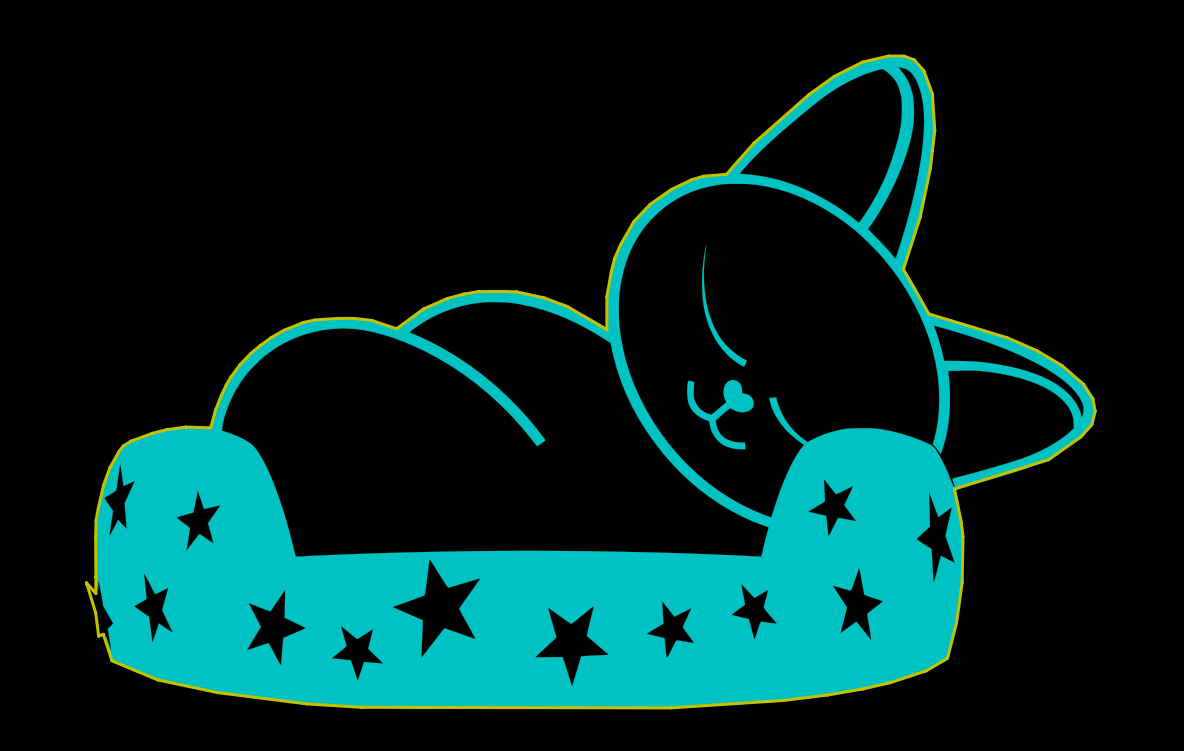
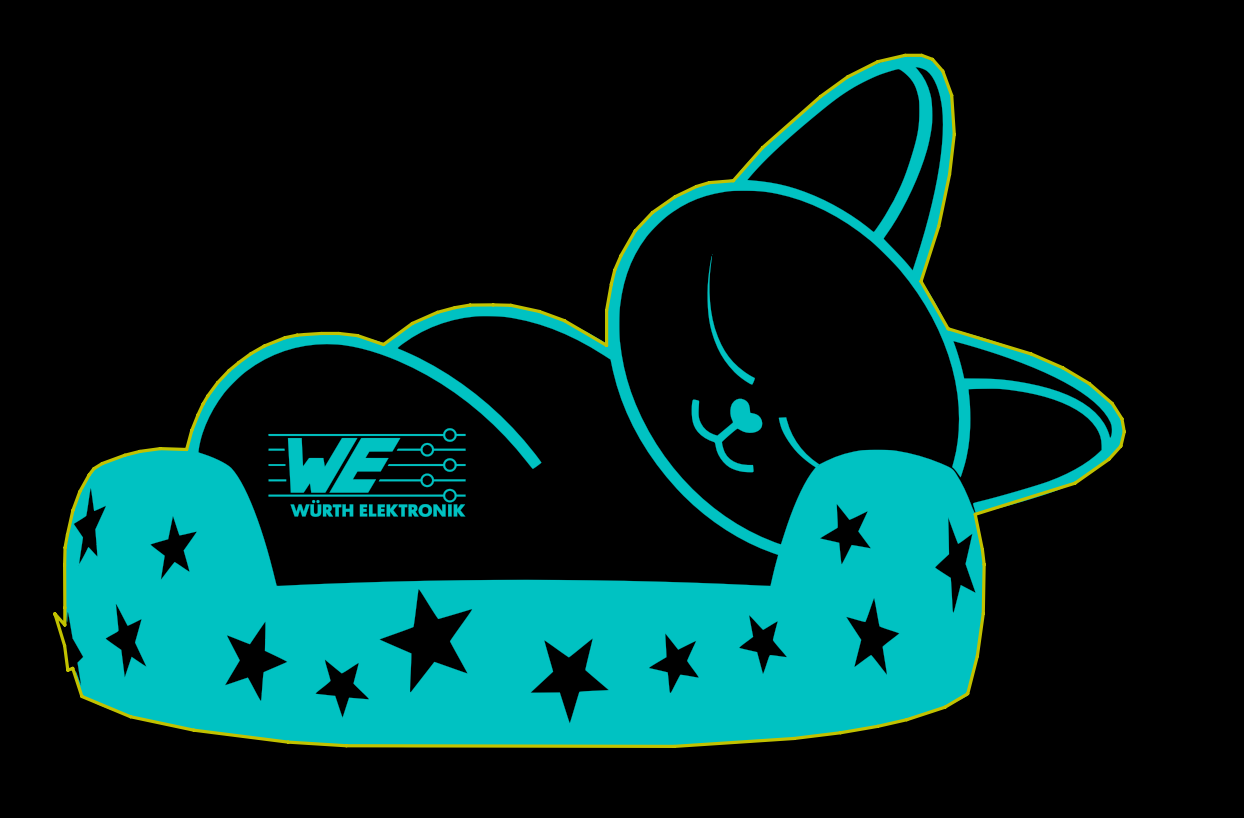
drawing: none -> [268, 428, 466, 517]

